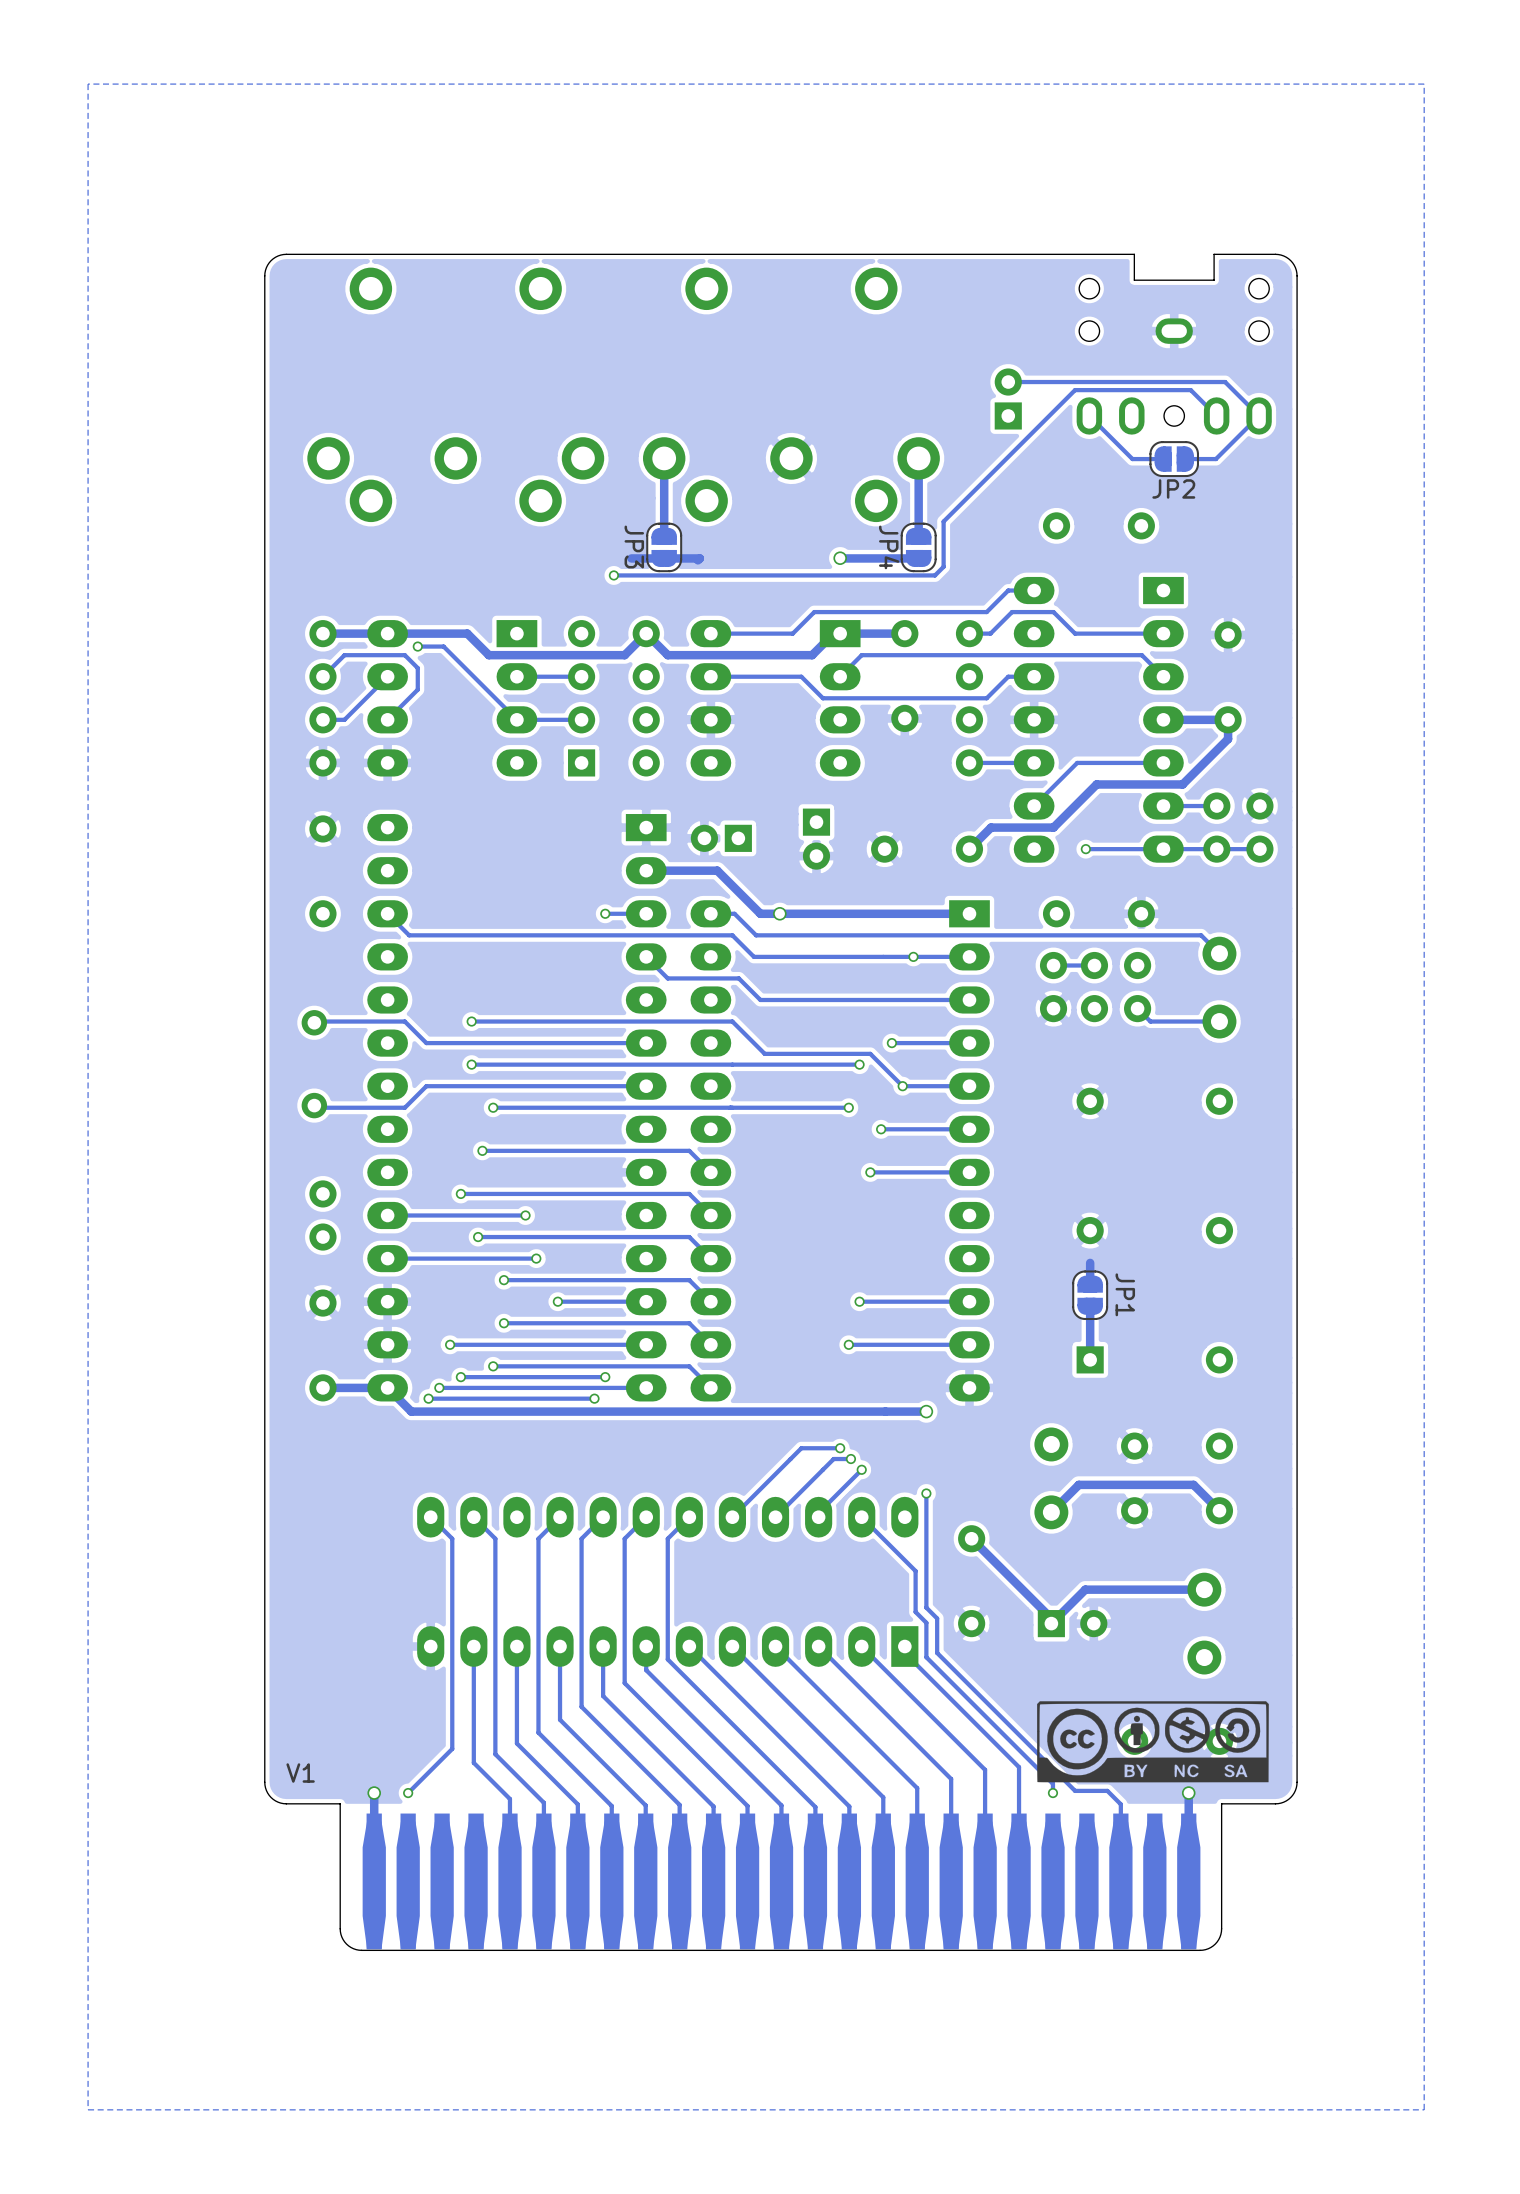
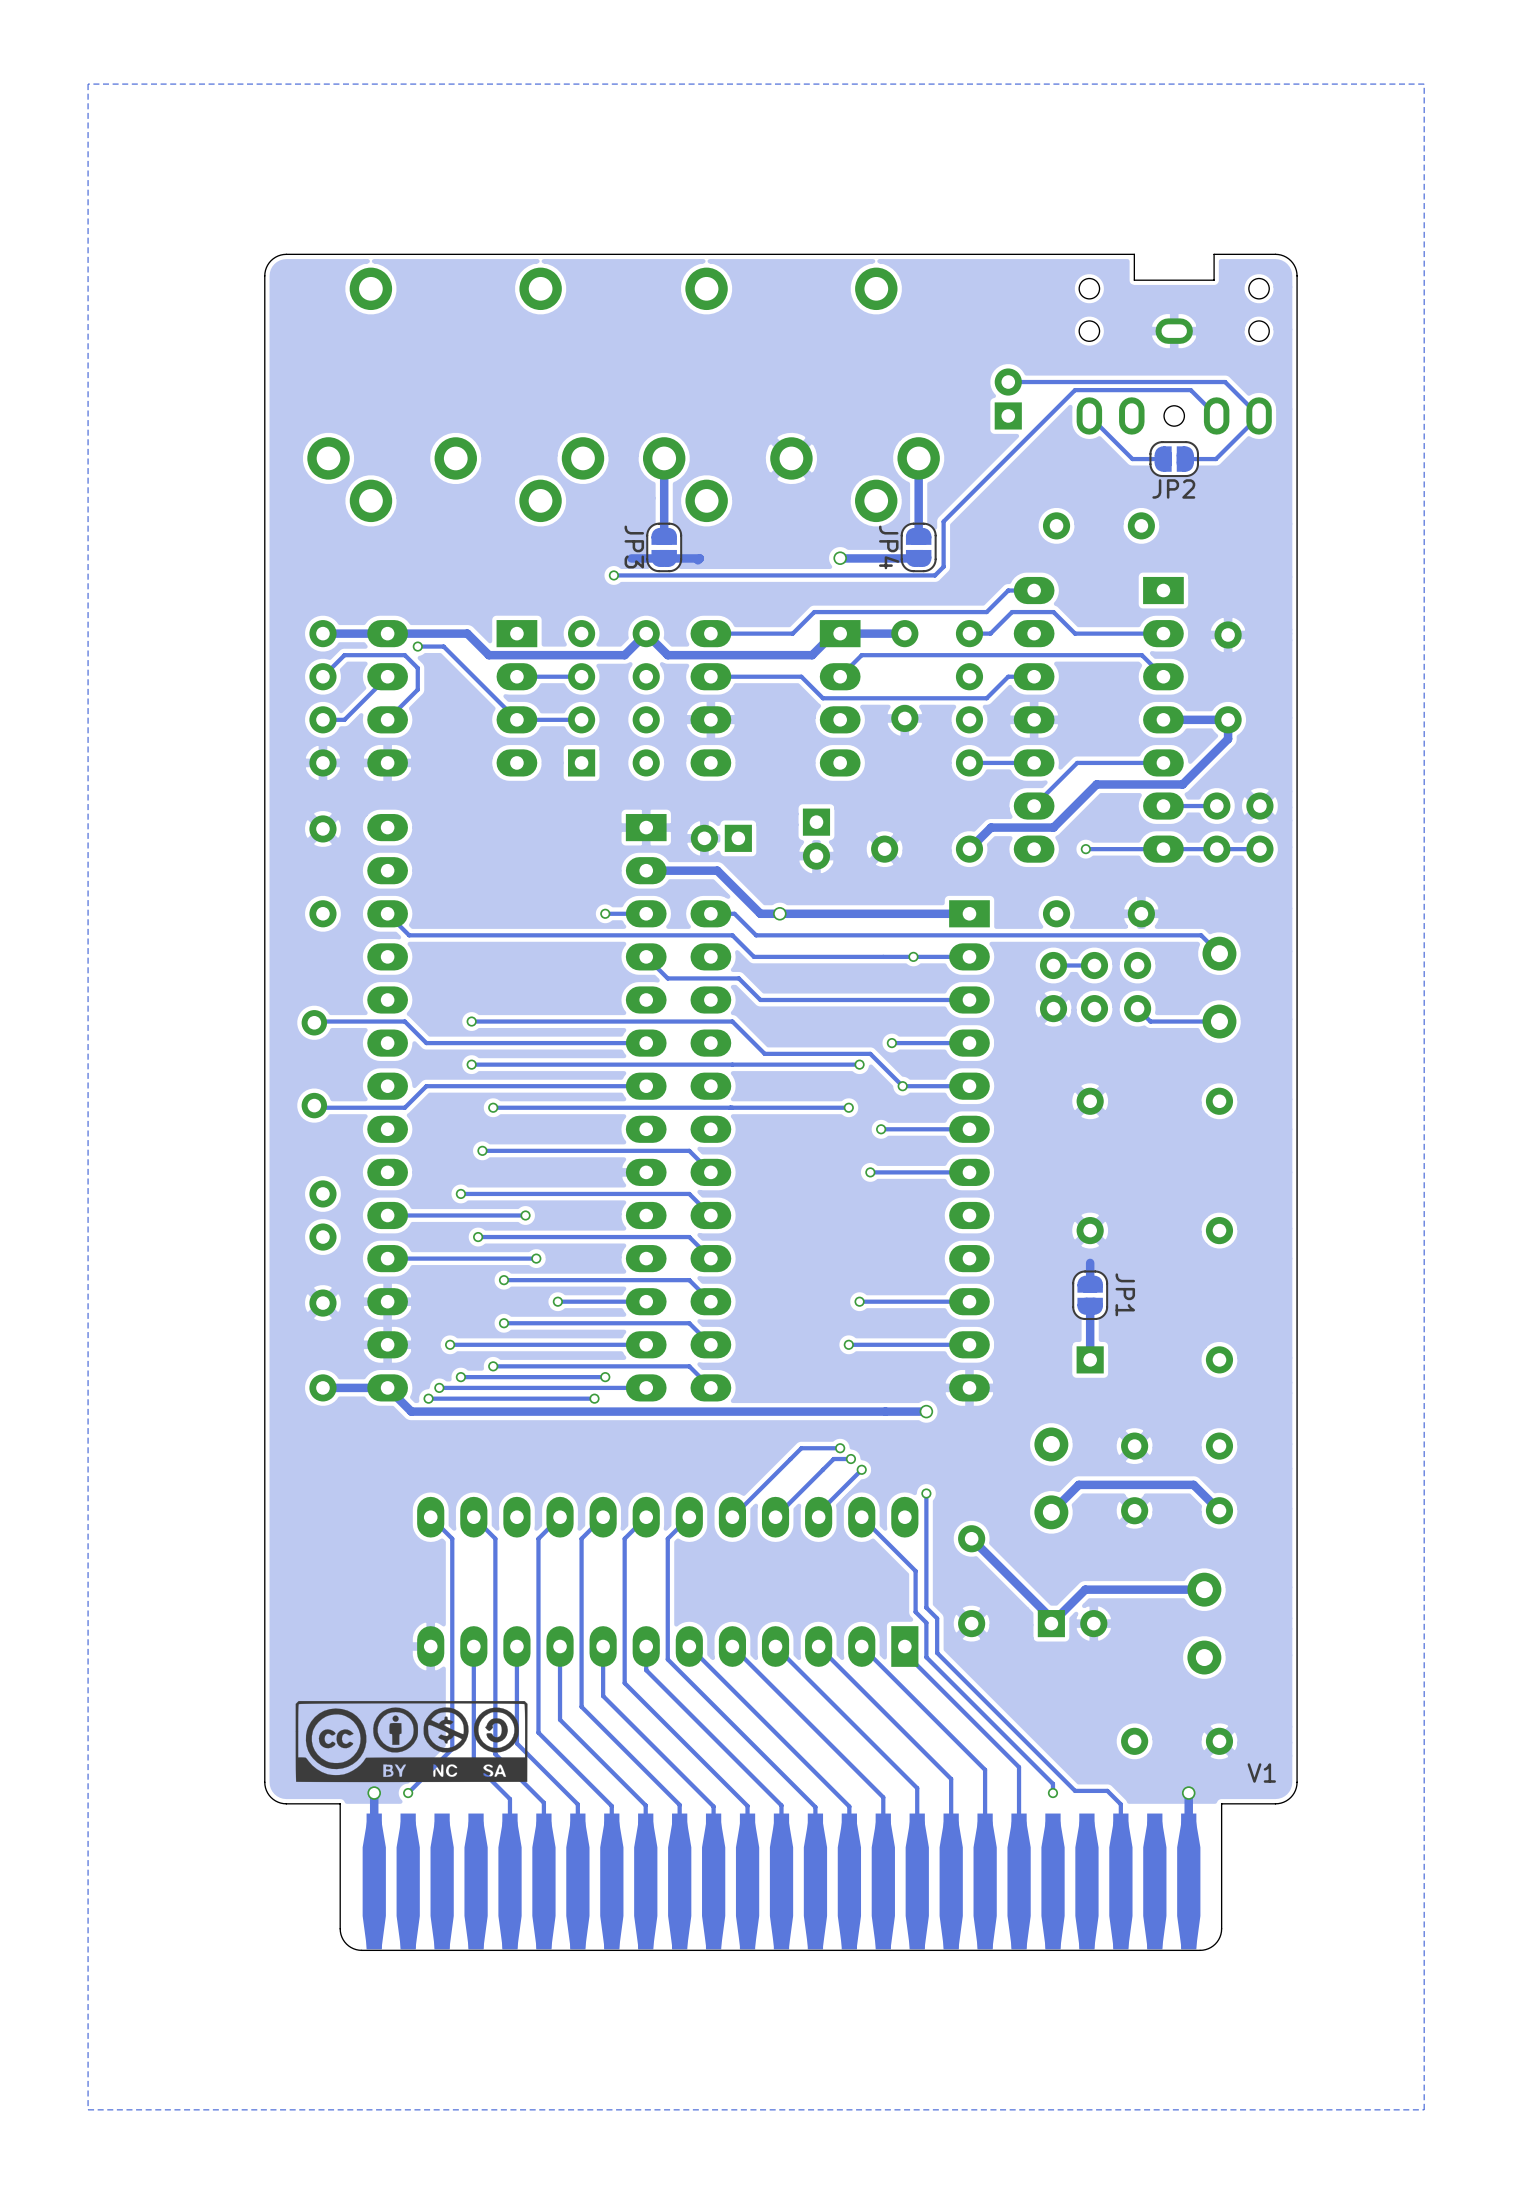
drawing: none -> [295, 1701, 528, 1783]
drawing: [1037, 1701, 1269, 1783] -> none
text: V1 (300, 1773) -> none
text: none -> V1 (1261, 1773)

